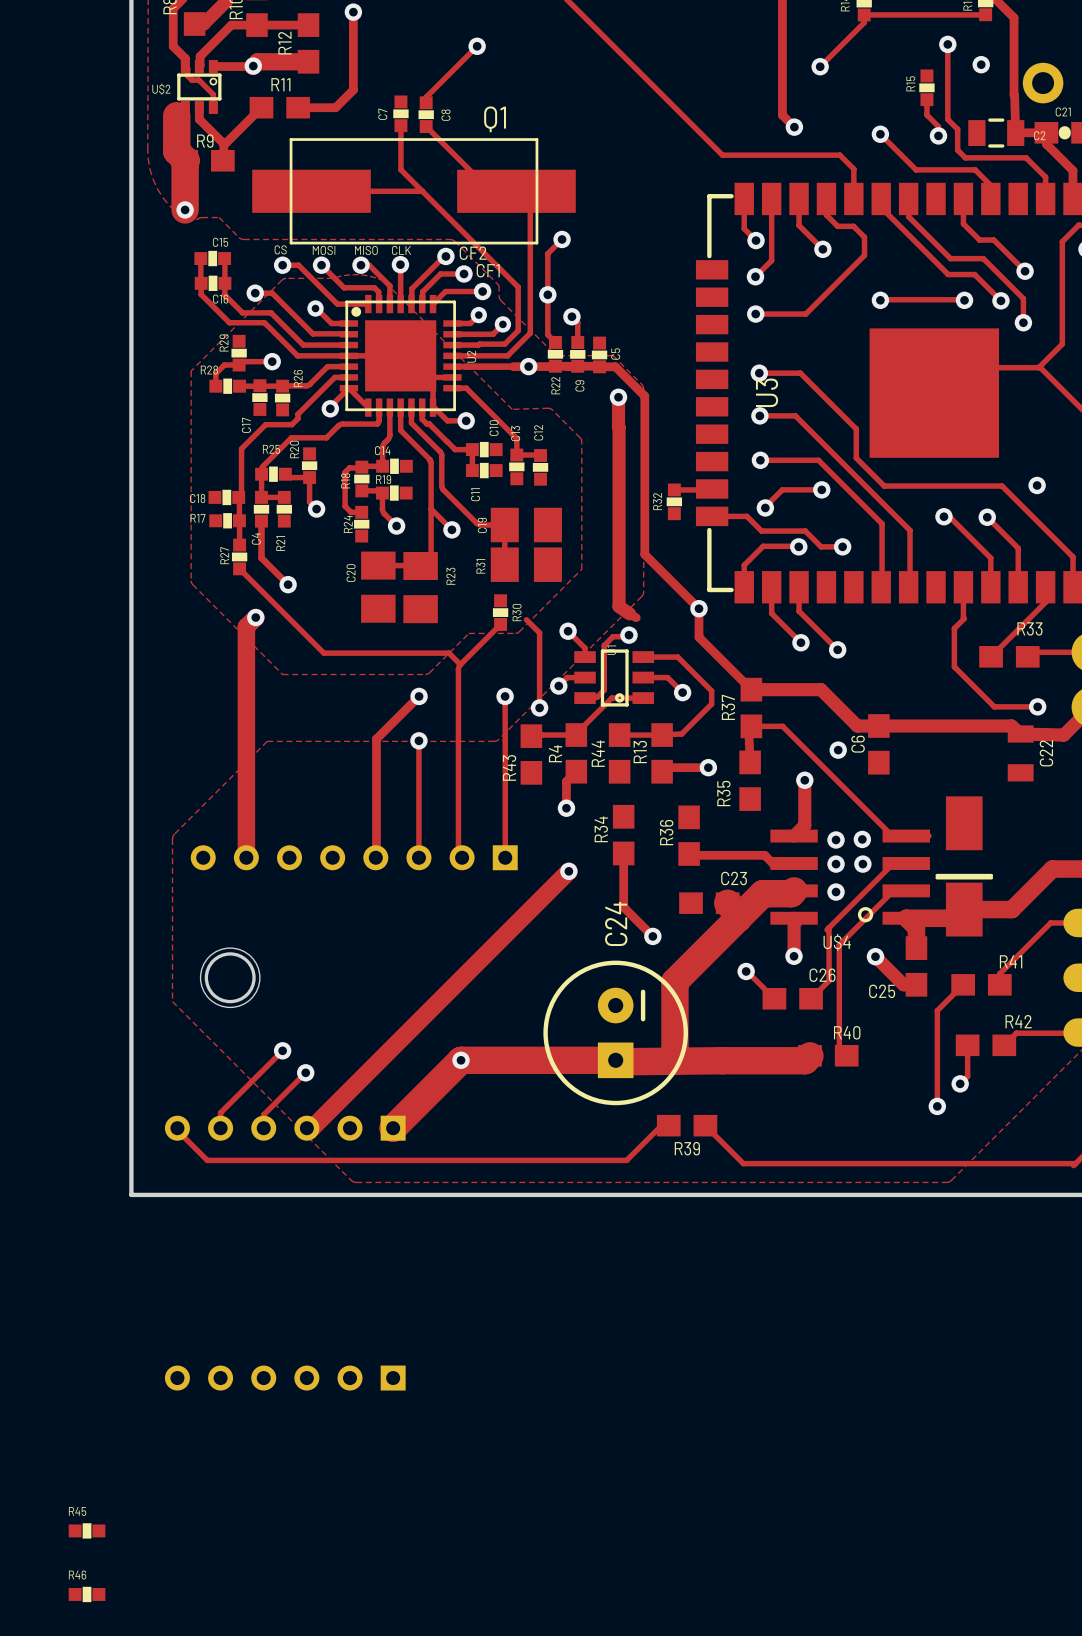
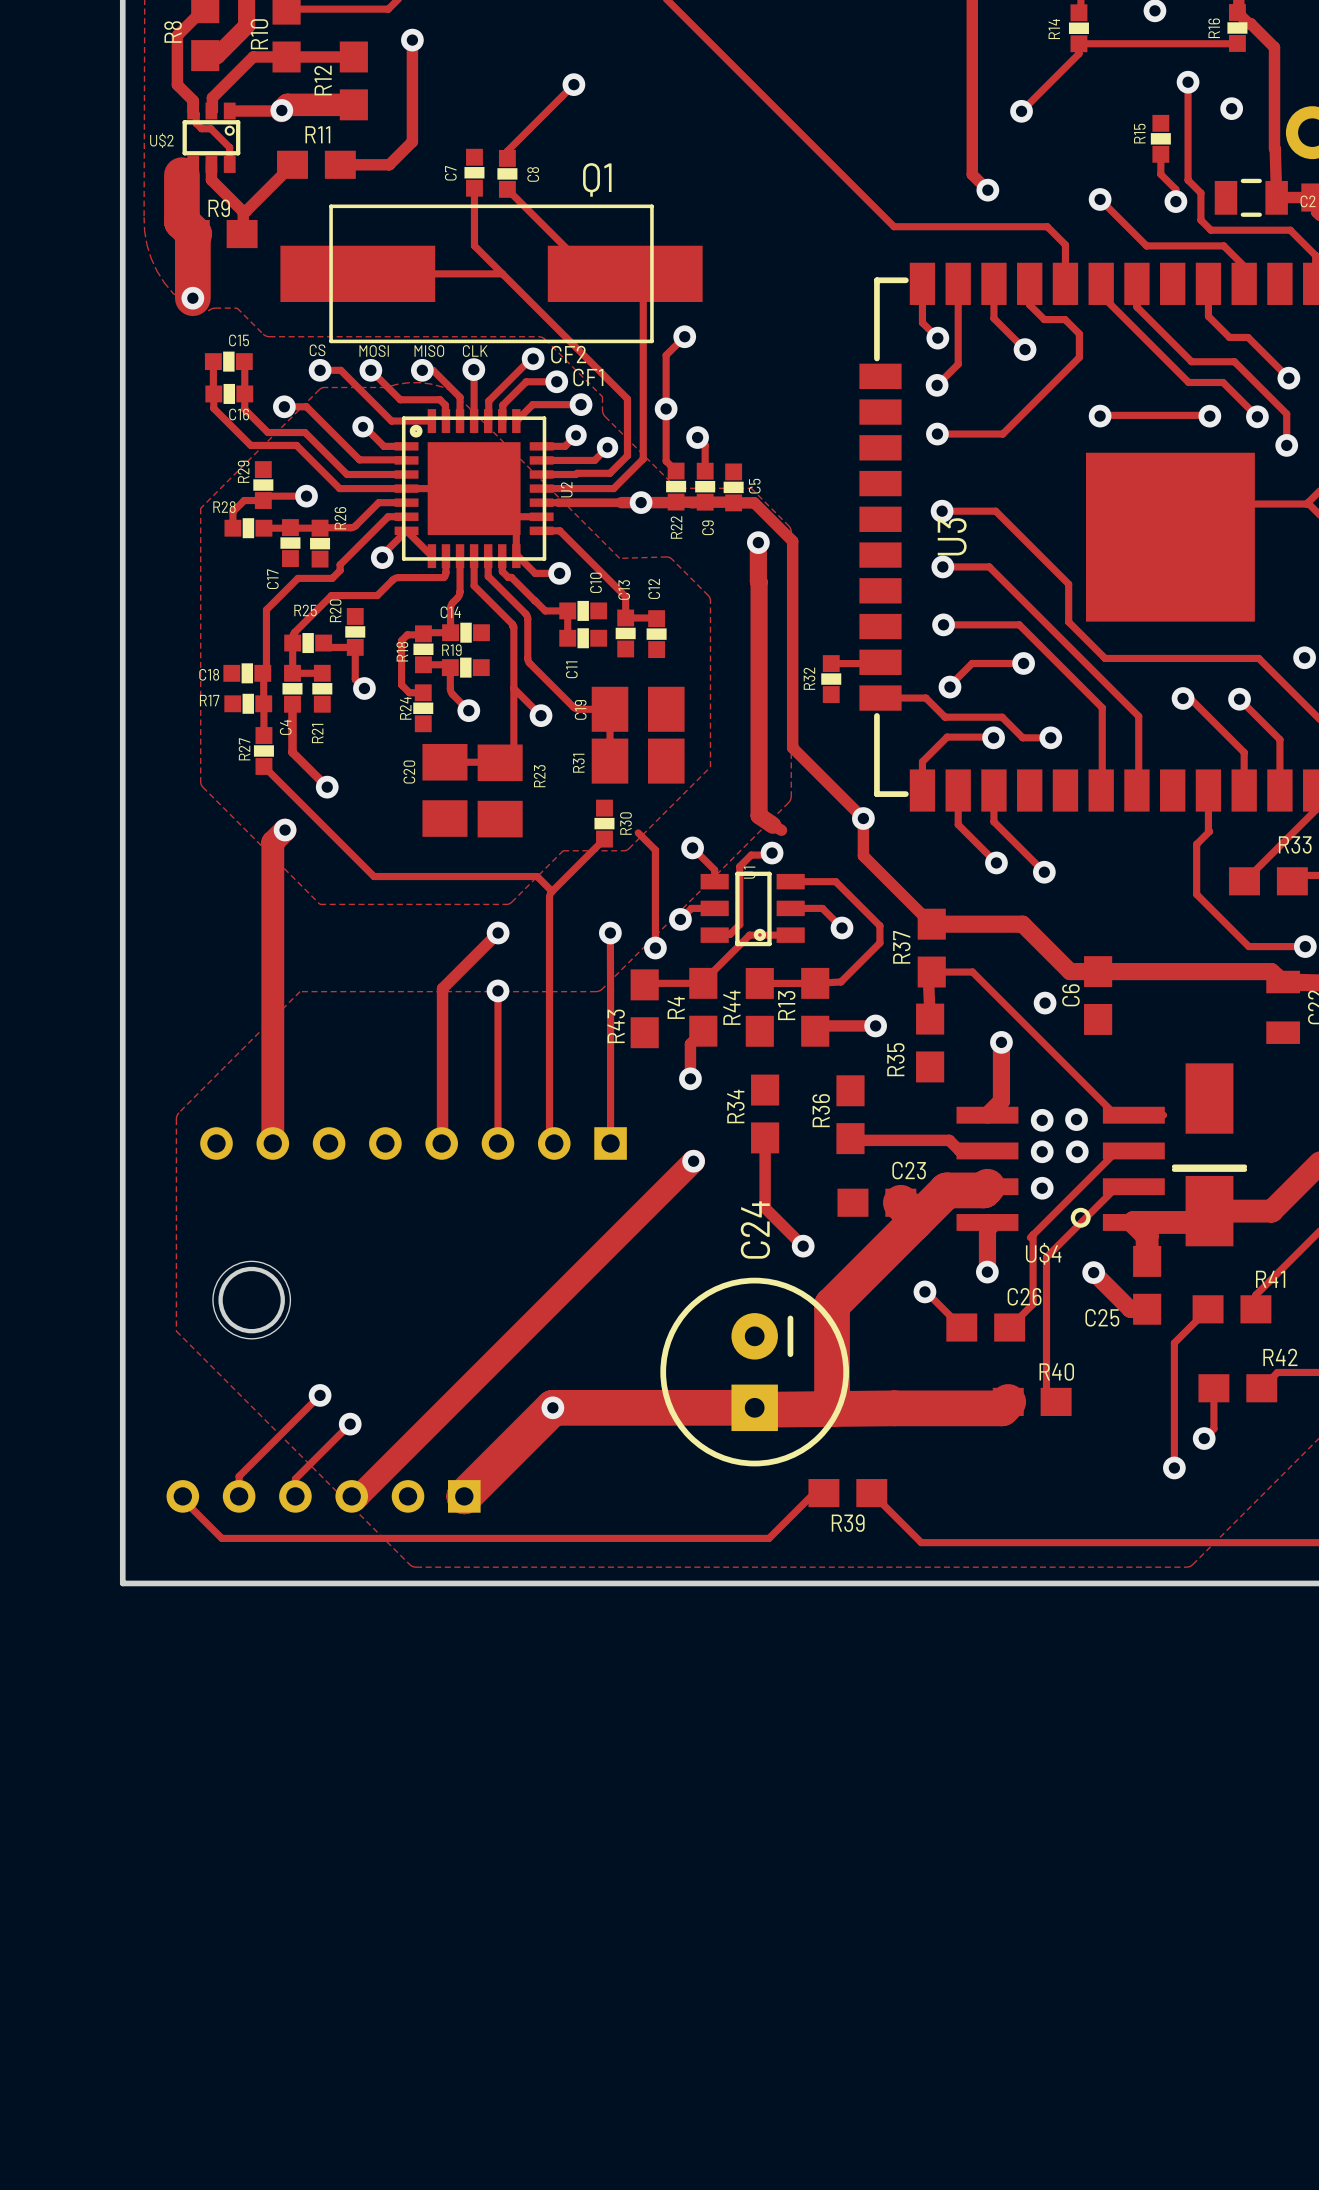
part: (285, 1378) -> none
R45: (87, 1530) -> none
R46: (87, 1594) -> none

